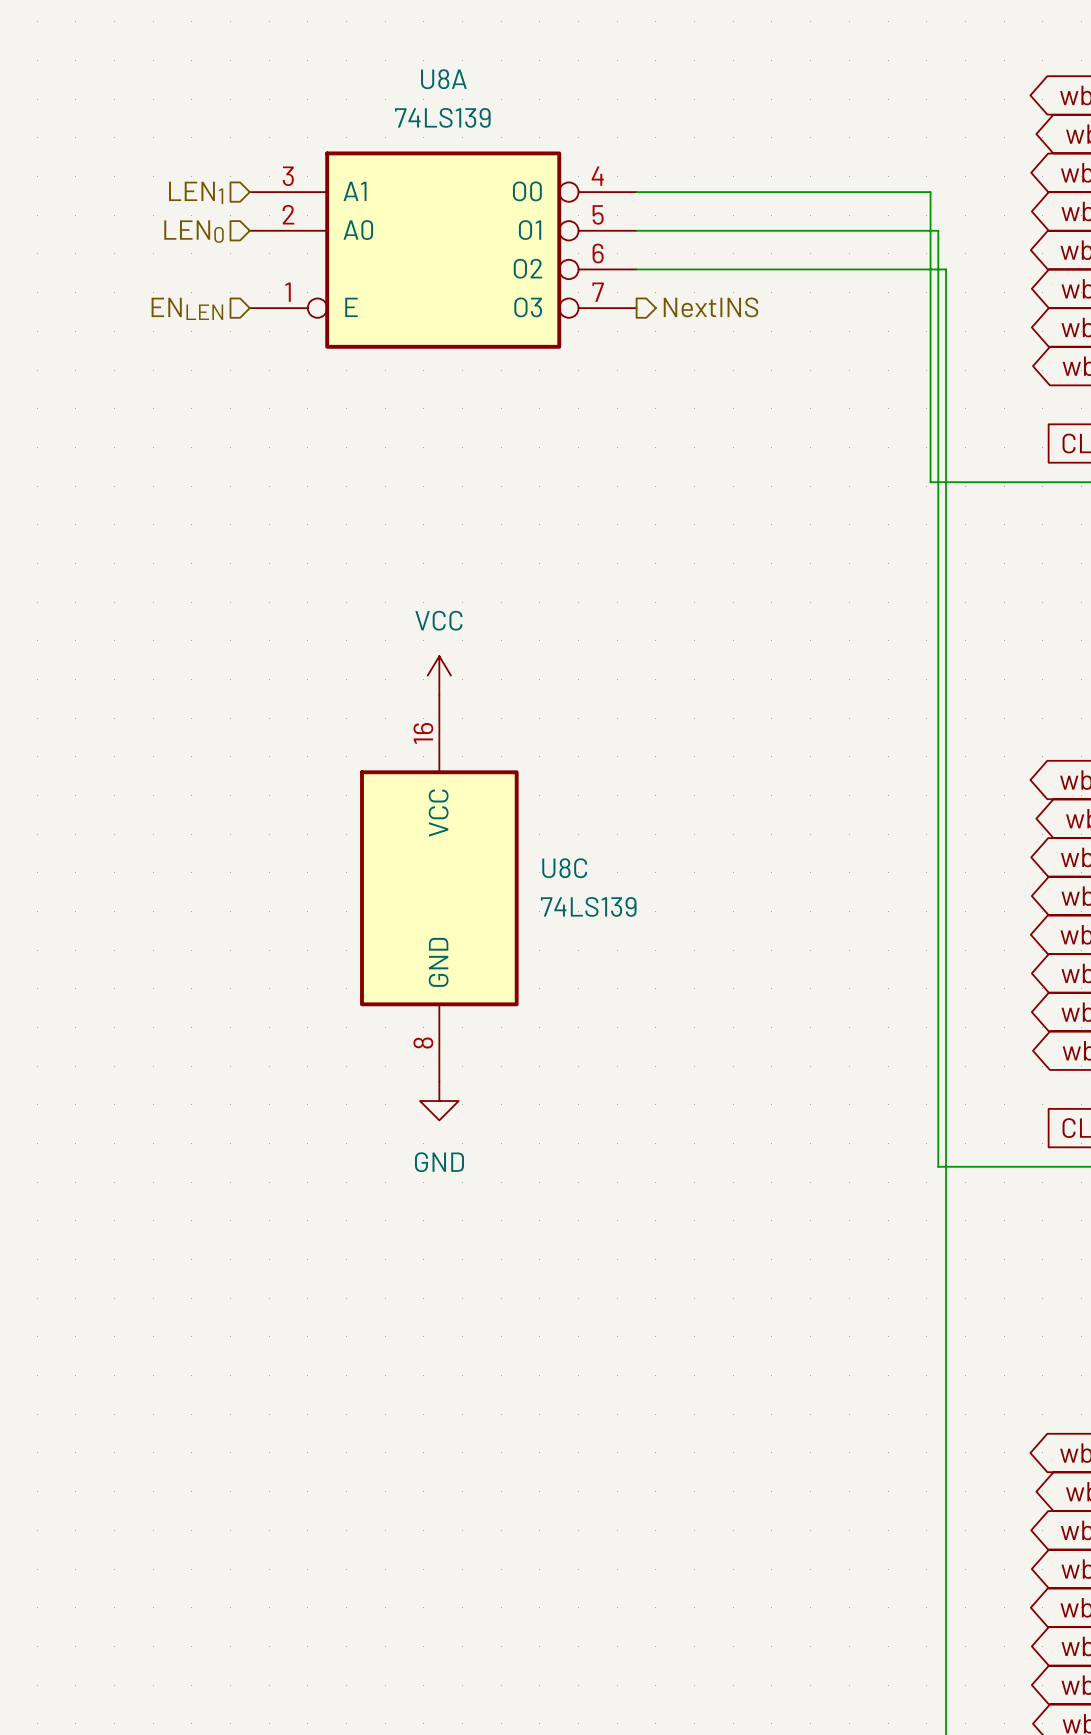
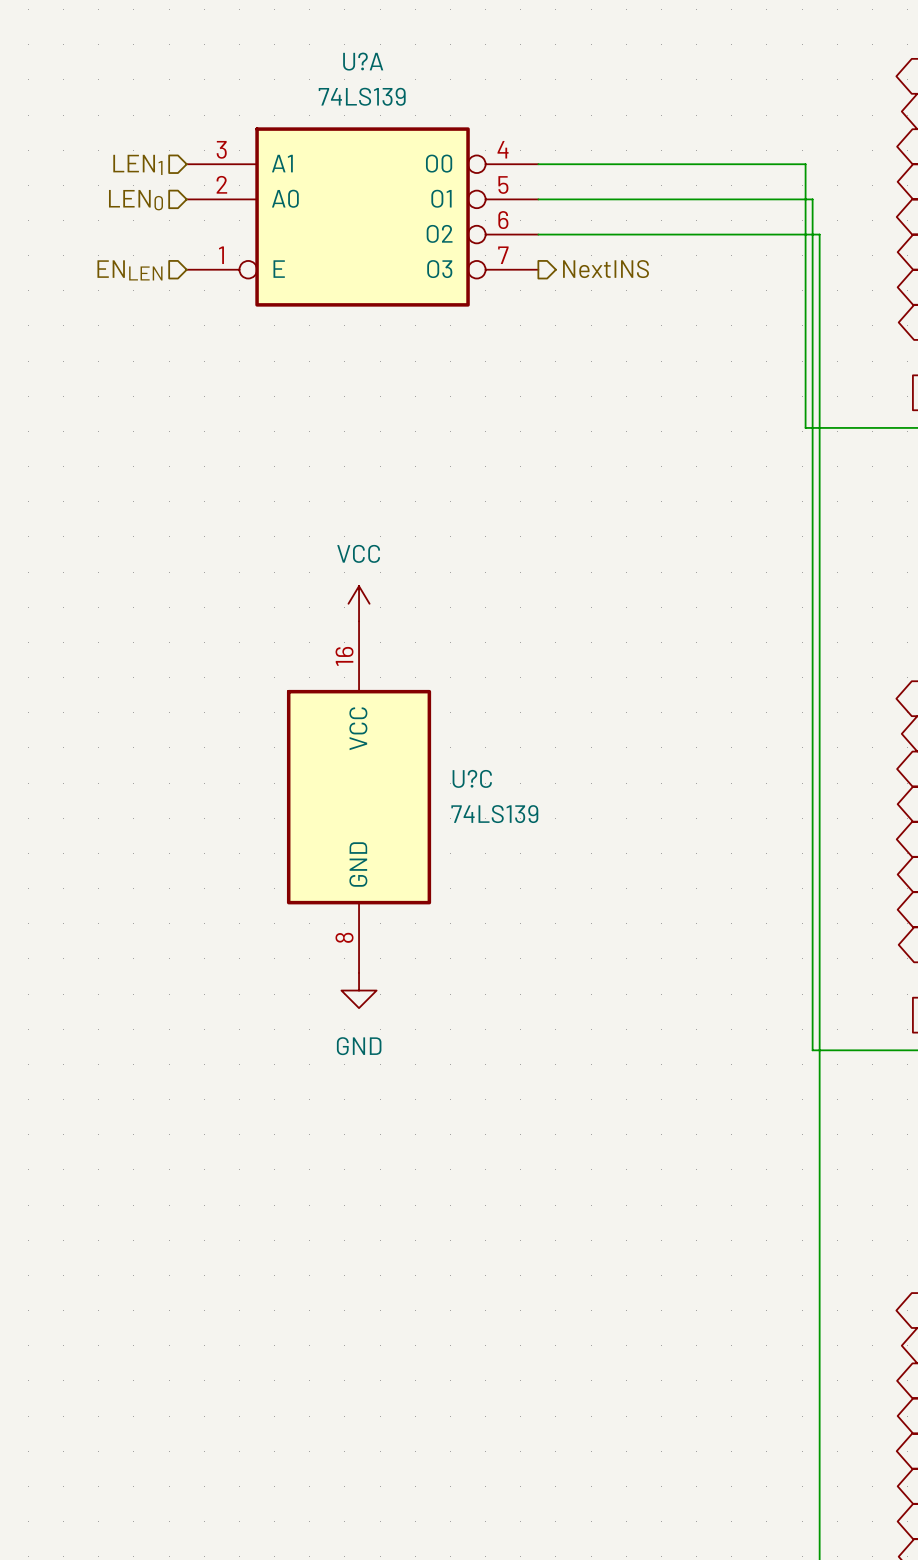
U8A name: U8A (443, 79) -> U?A (363, 61)
U8C name: U8C (564, 868) -> U?C (472, 778)

